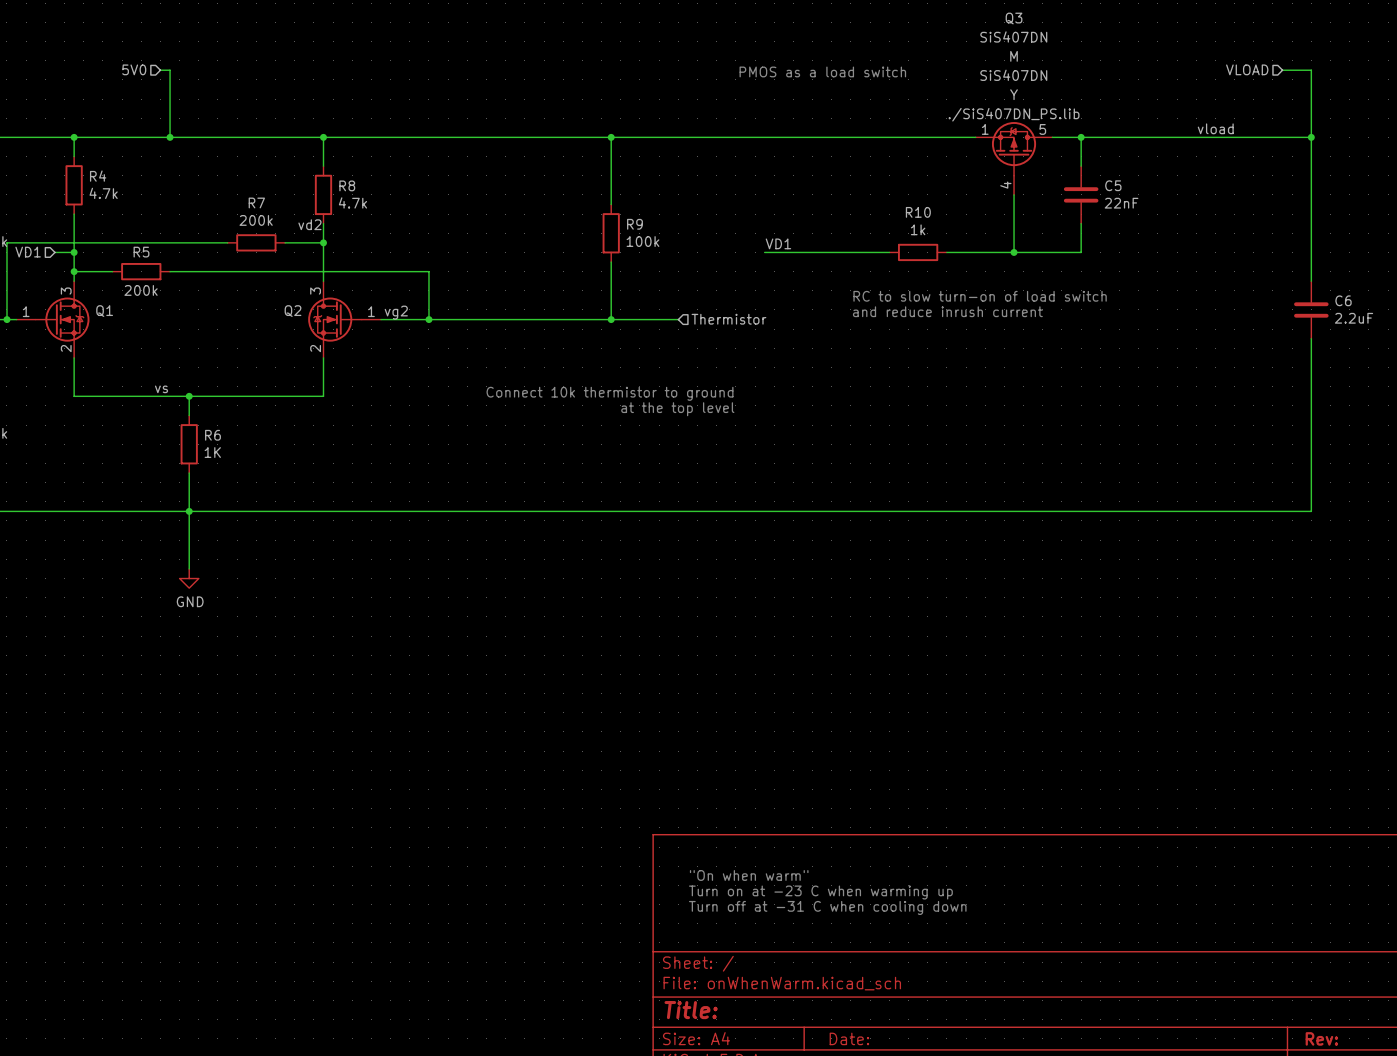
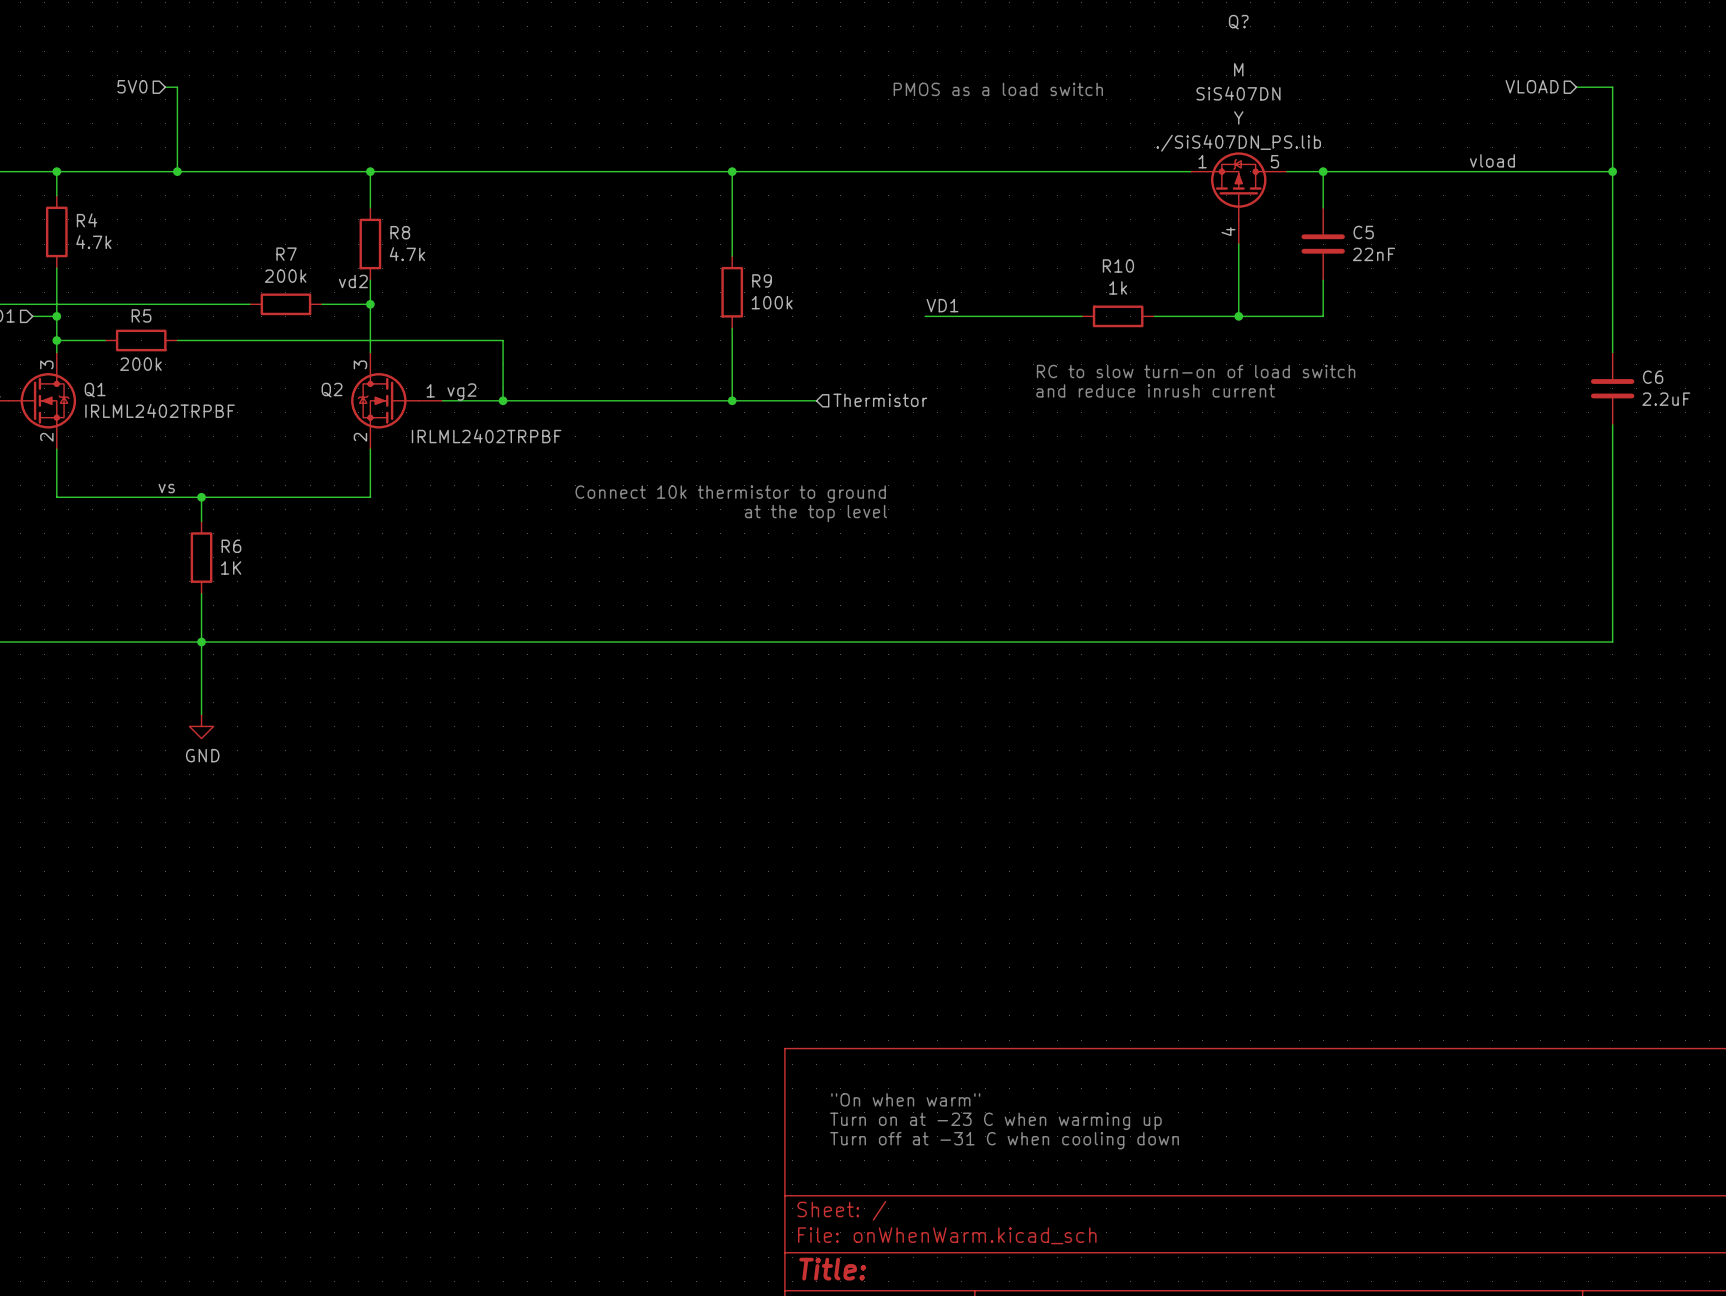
Q3 name: Q3 (1014, 18) -> Q? (1238, 22)
Q3 value: SiS407DN (1013, 36) -> none
Q1 value: none -> IRLML2402TRPBF (160, 410)
Q2 value: none -> IRLML2402TRPBF (486, 436)

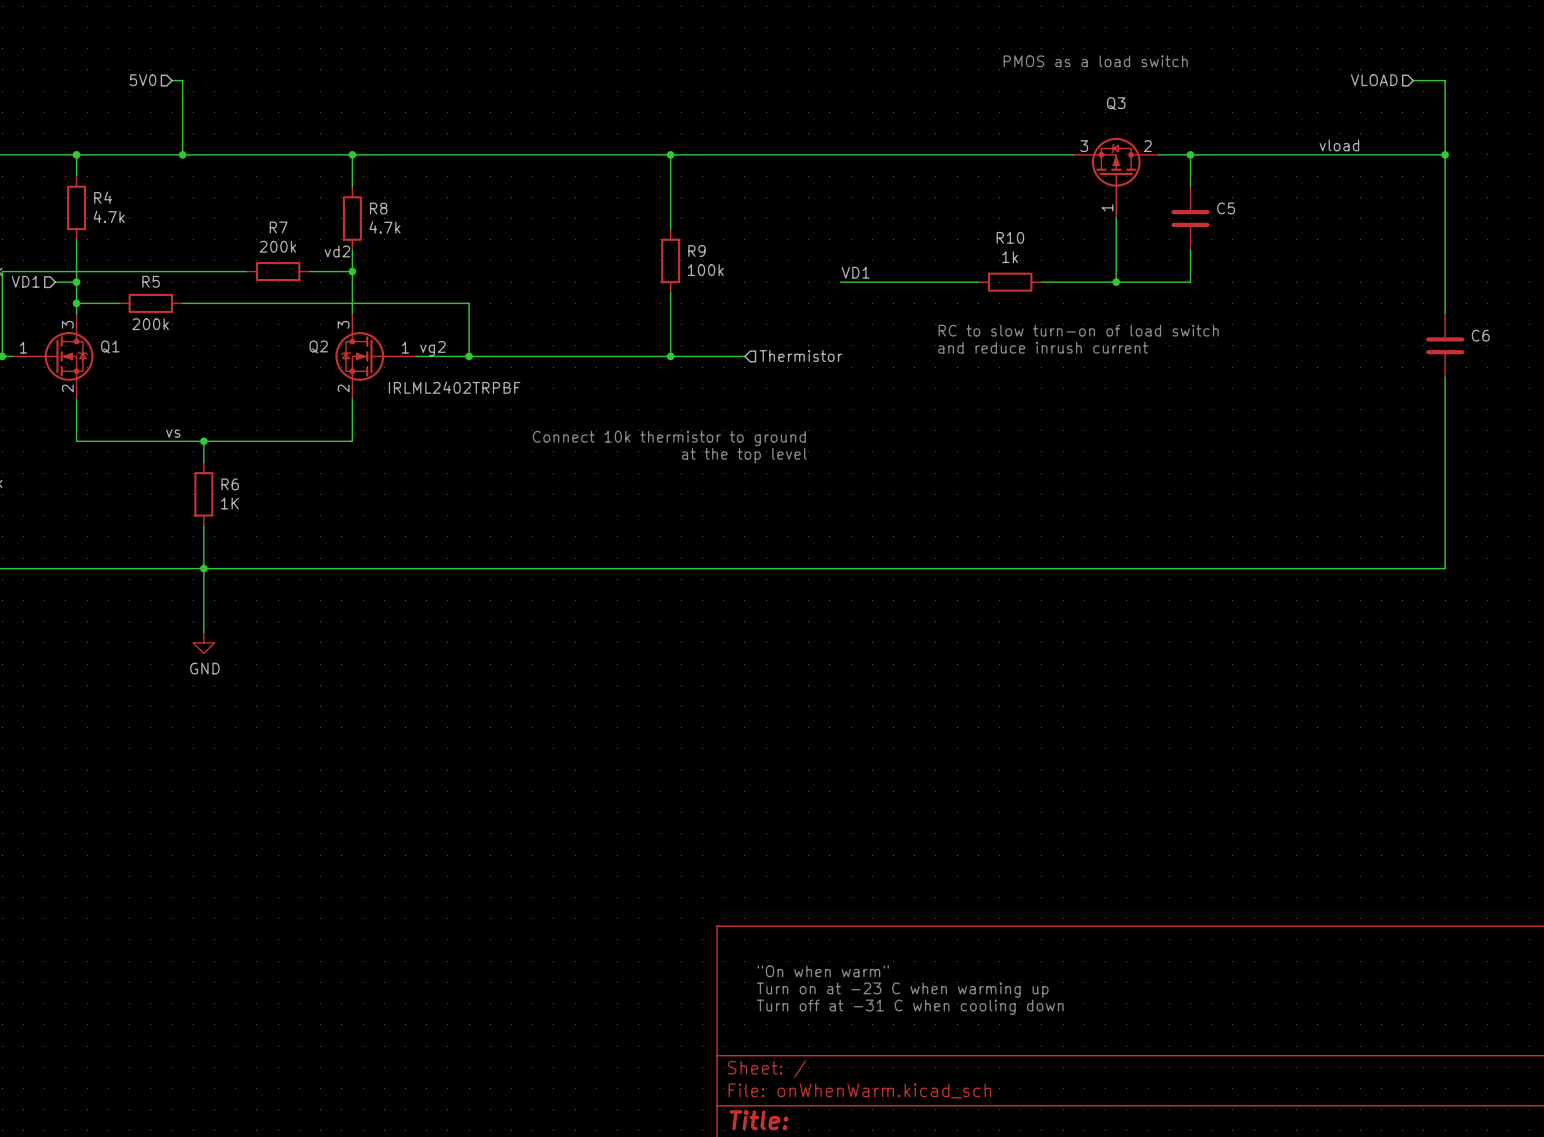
Q? name: Q? (1238, 22) -> Q3 (1116, 103)
Q? text: M (1238, 69) -> none
text position: PMOS as a load switch (998, 89) -> PMOS as a load switch (1095, 61)
Q? text: SiS407DN (1238, 93) -> none
Q? text: Y (1238, 117) -> none
Q? text: ./SiS407DN_PS.lib (1238, 143) -> none
Q? pin number: 1 (1202, 161) -> 3 (1084, 146)
Q? pin number: 5 (1274, 161) -> 2 (1147, 146)
Q? pin number: 4 (1228, 231) -> 1 (1107, 207)
C5 value: 22nF (1373, 254) -> none
C6 value: 2.2uF (1666, 399) -> none
Q1 value: IRLML2402TRPBF (160, 410) -> none

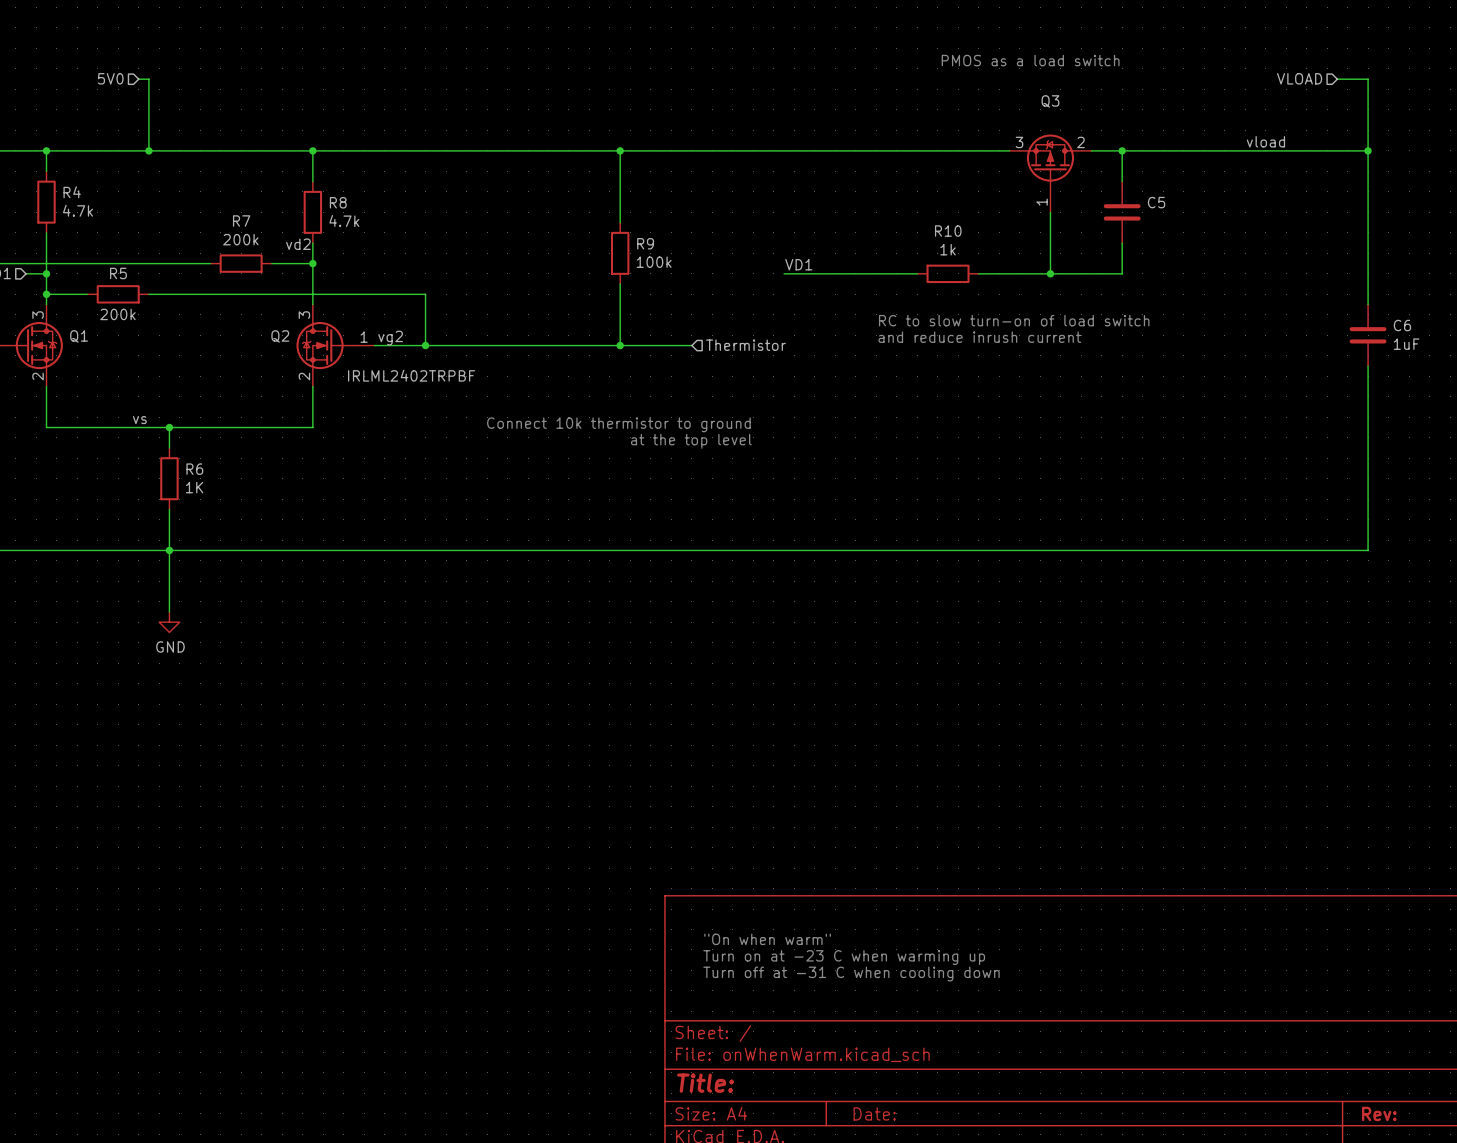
C6 value: none -> 1uF (1406, 344)

